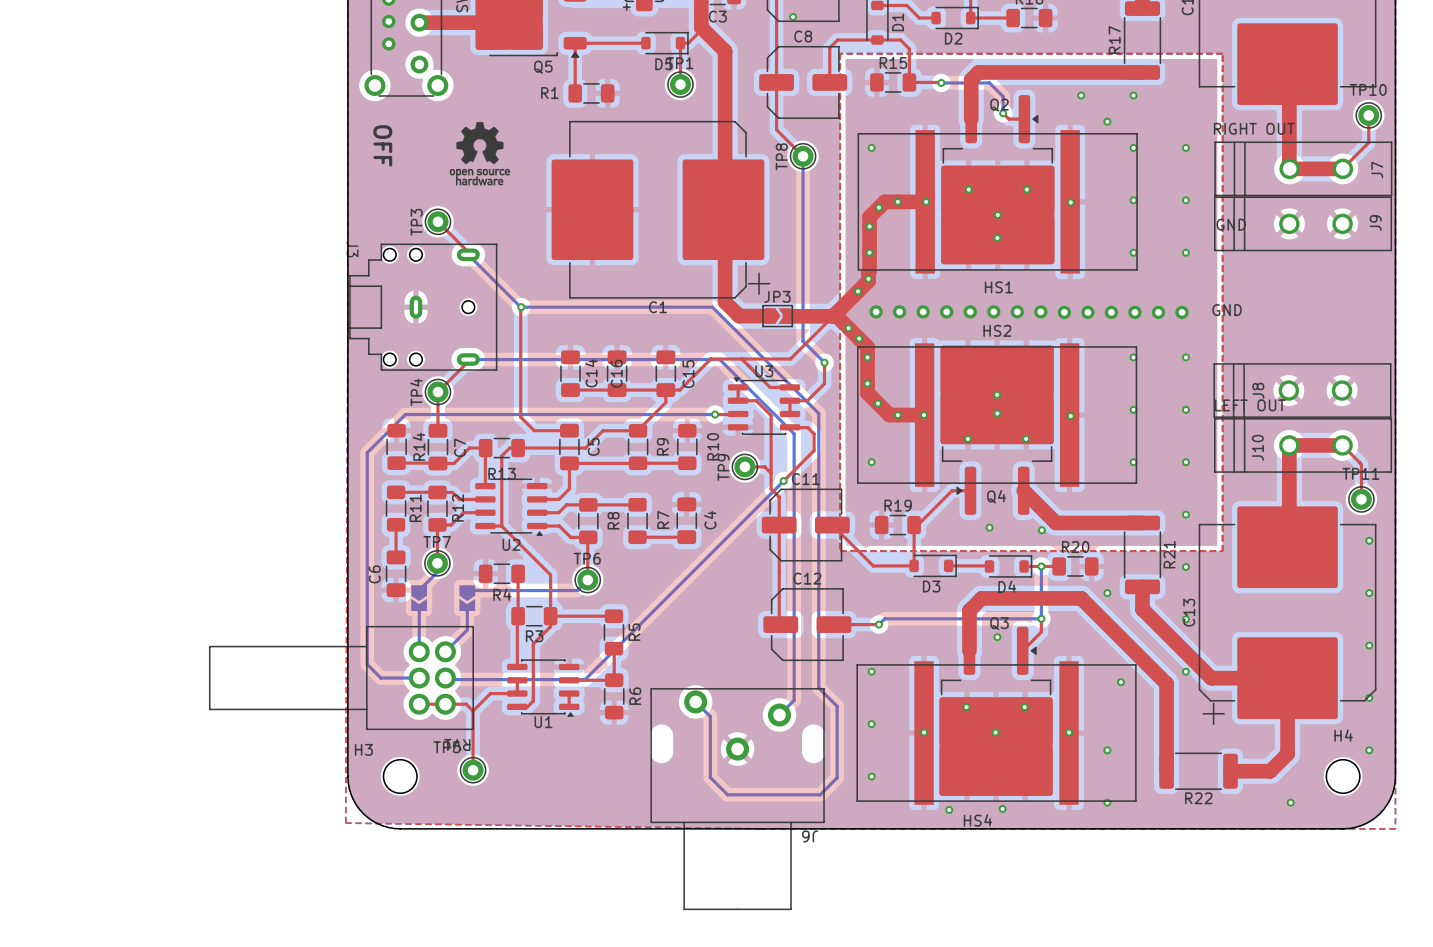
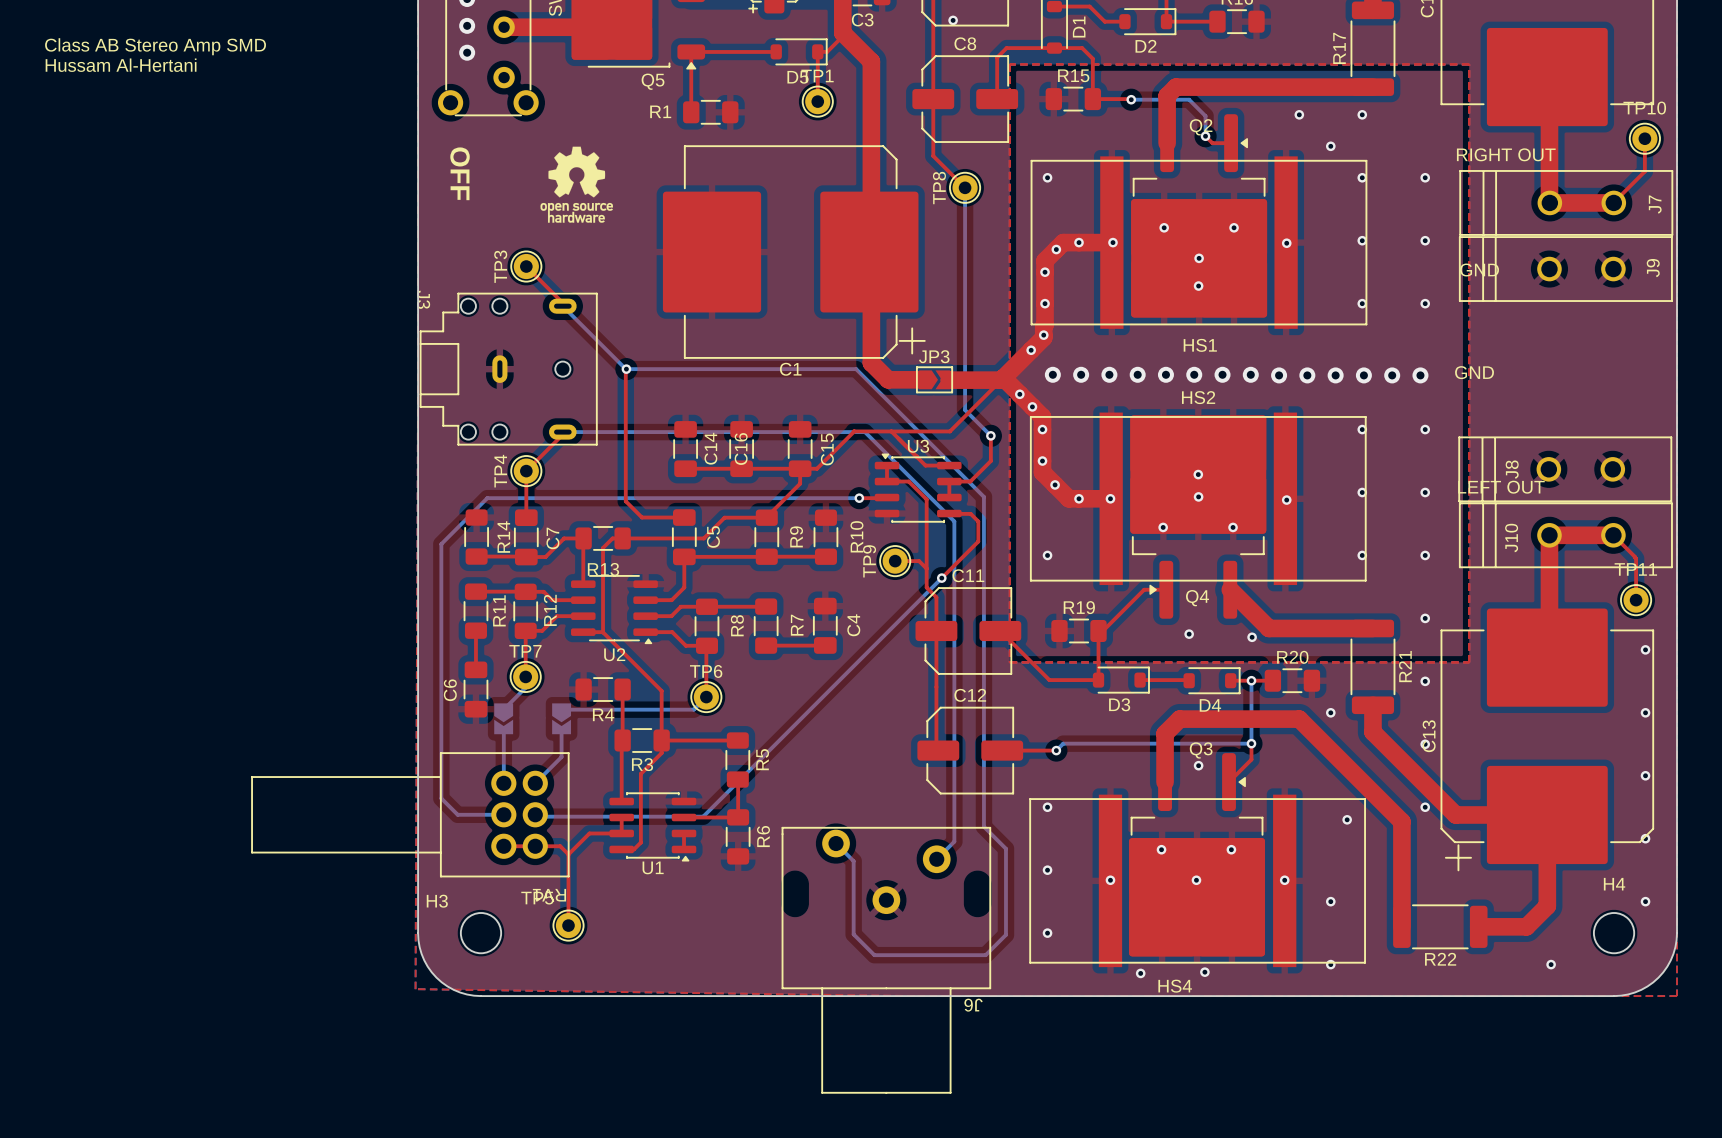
text: none -> Class AB Stereo Amp SMD (155, 46)
text: none -> Hussam Al-Hertani (121, 65)

